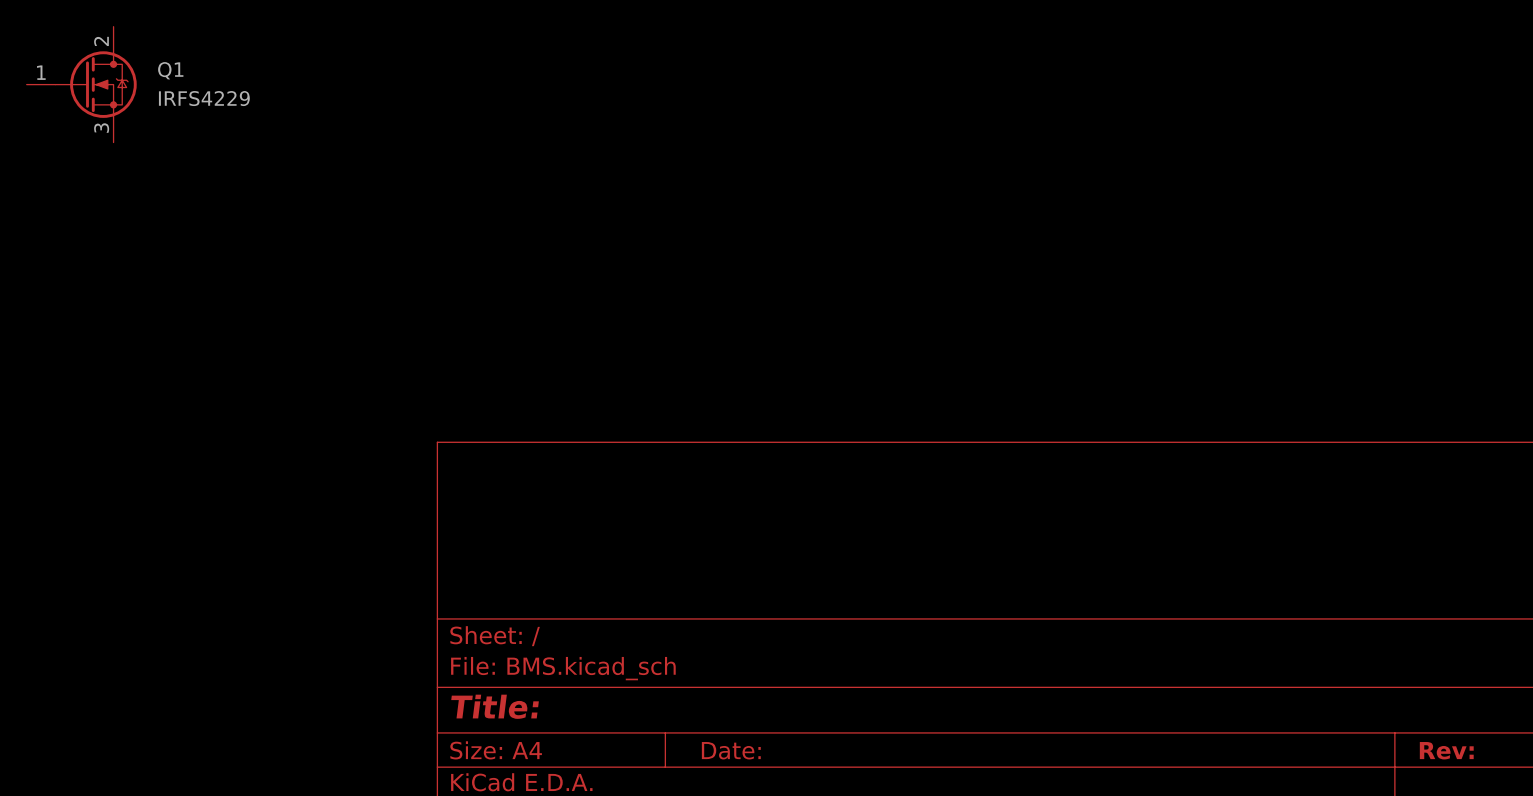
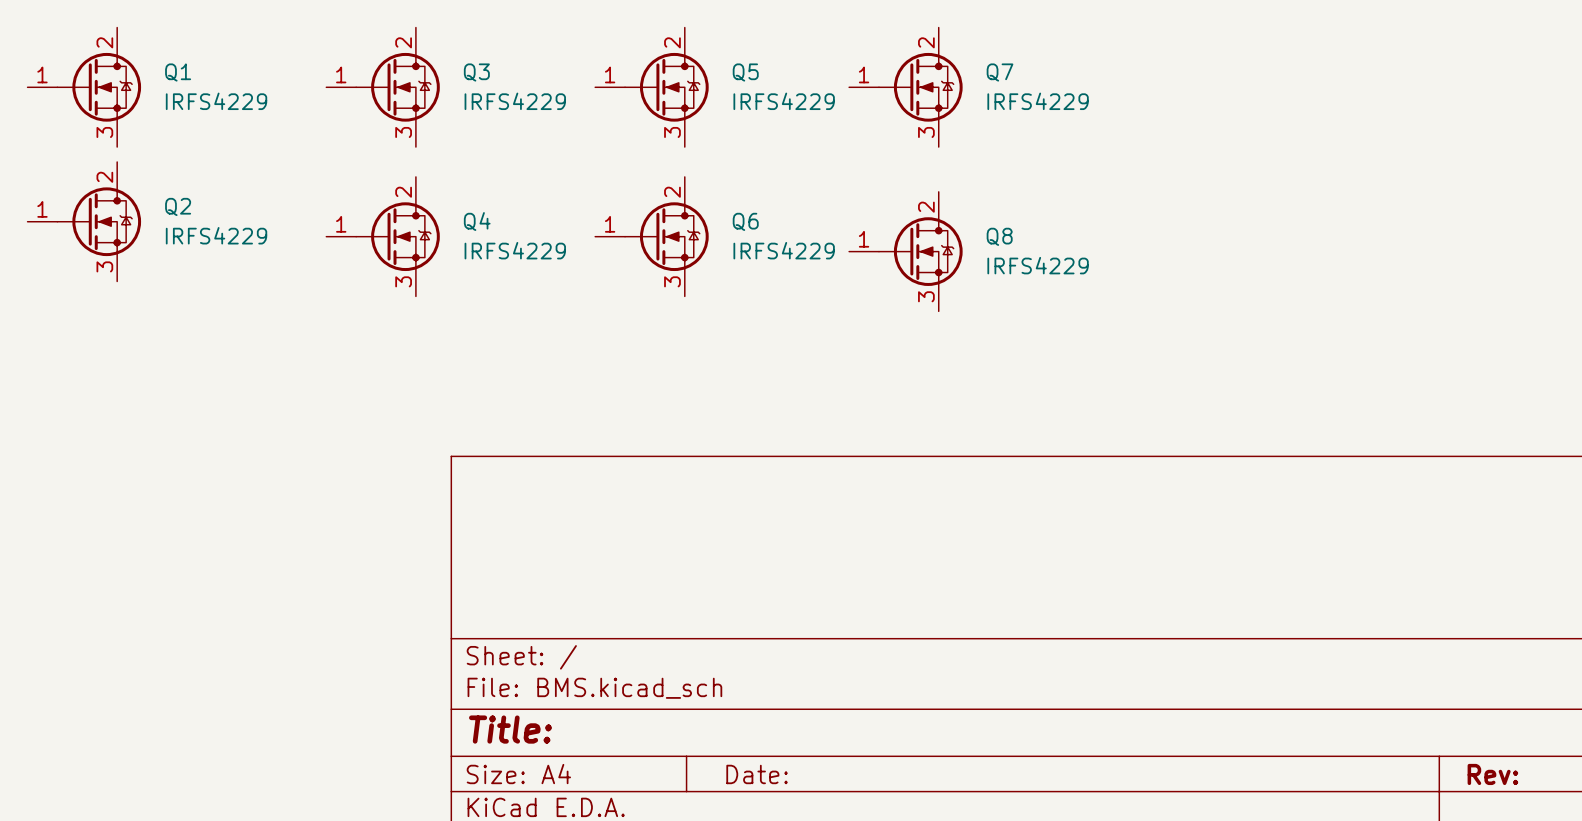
Q3: none -> IRFS4229 (383, 87)
Q5: none -> IRFS4229 (651, 87)
Q7: none -> IRFS4229 (905, 87)
Q2: none -> IRFS4229 (84, 221)
Q4: none -> IRFS4229 (383, 236)
Q6: none -> IRFS4229 (651, 236)
Q8: none -> IRFS4229 (905, 251)

